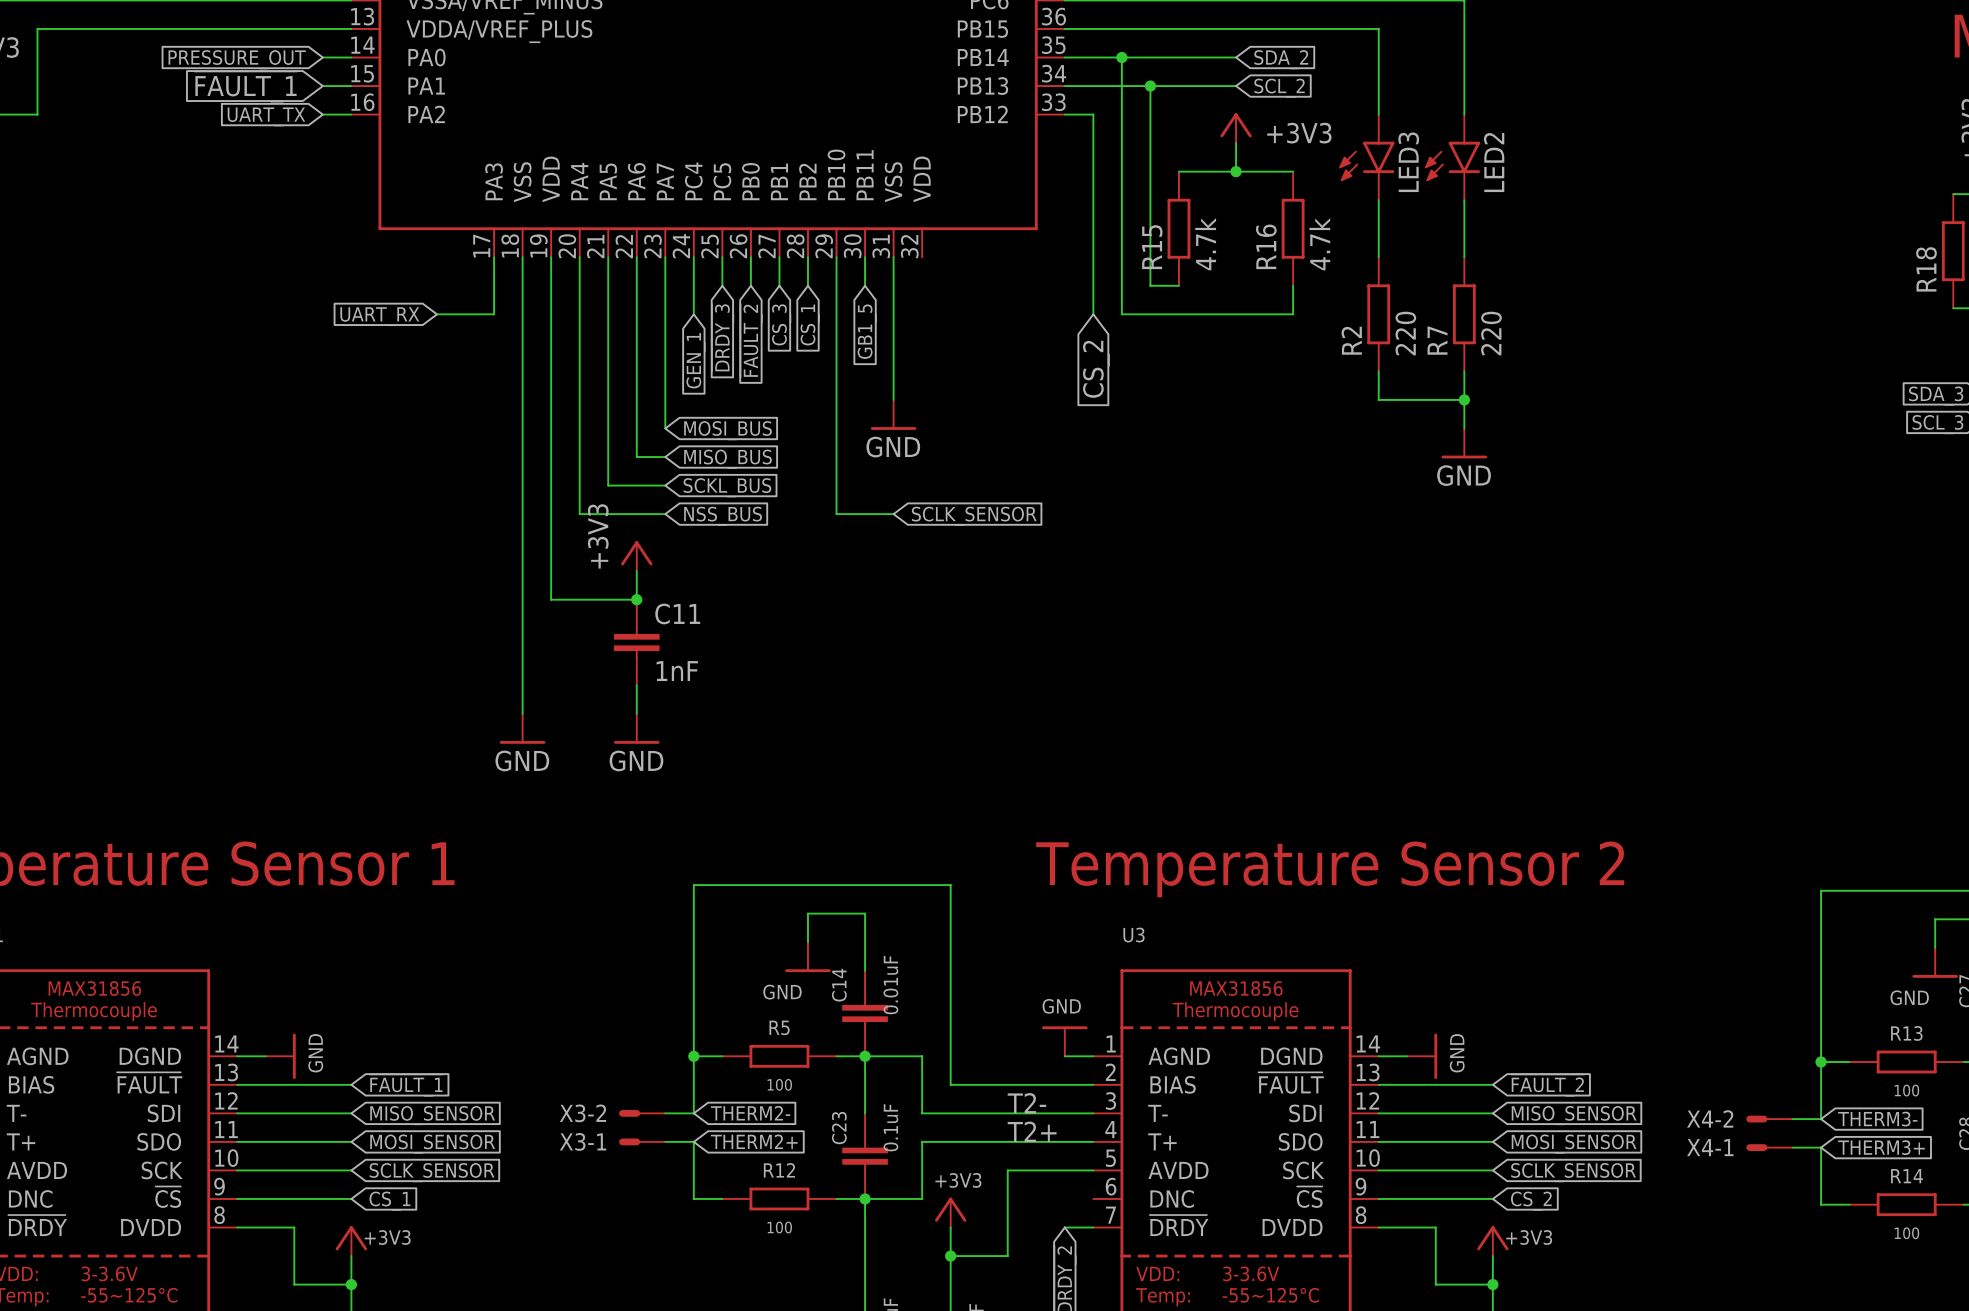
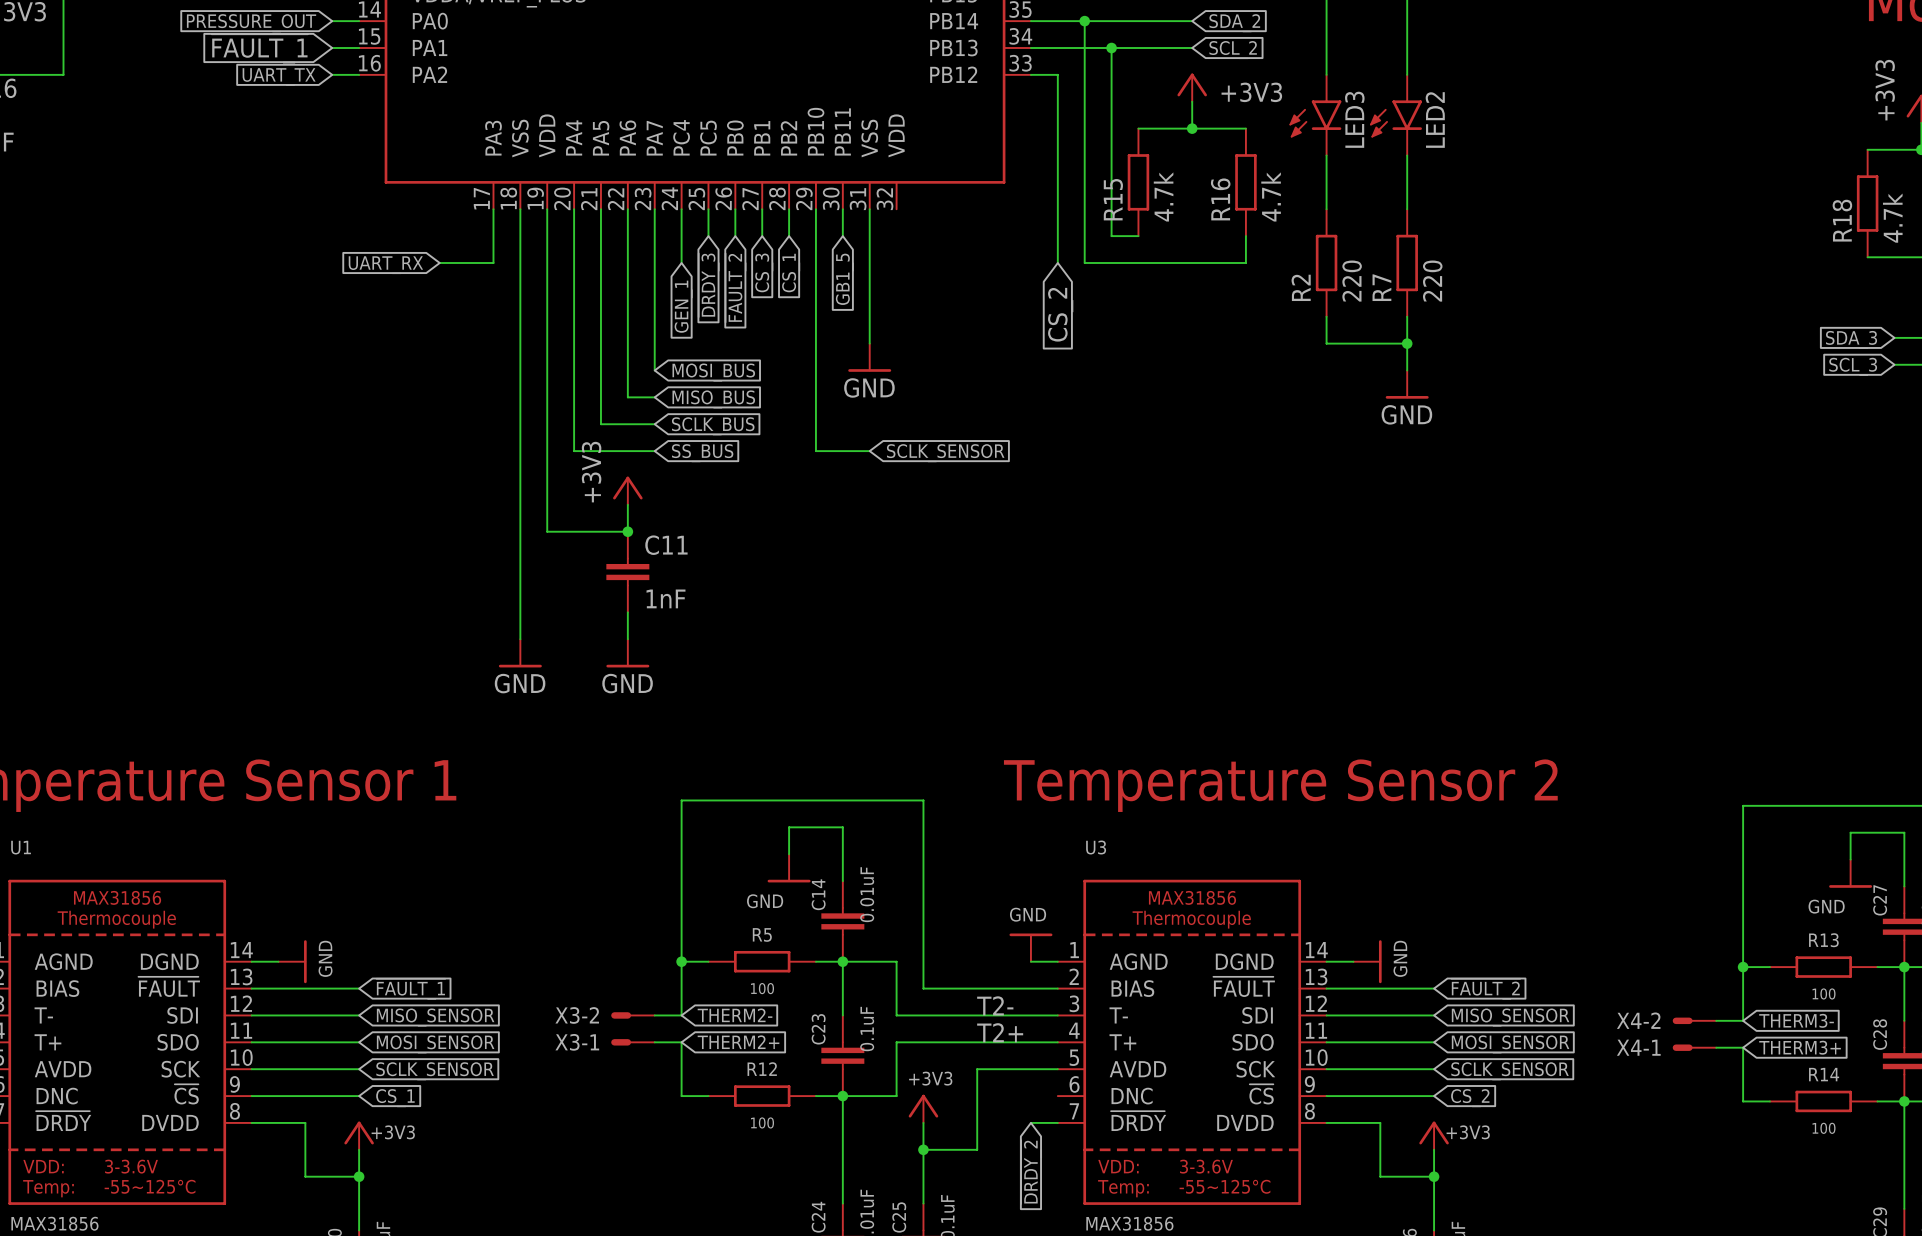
global label: SCKL_BUS (727, 487) -> SCLK_BUS (713, 426)
global label: NSS_BUS (723, 516) -> SS_BUS (702, 453)

